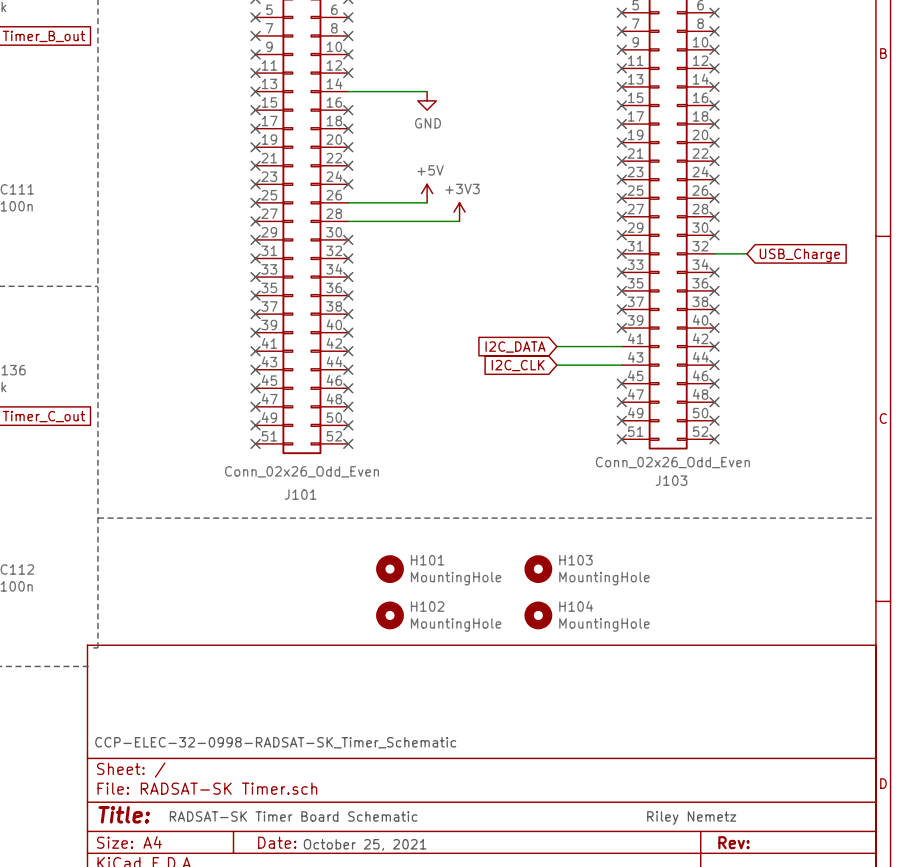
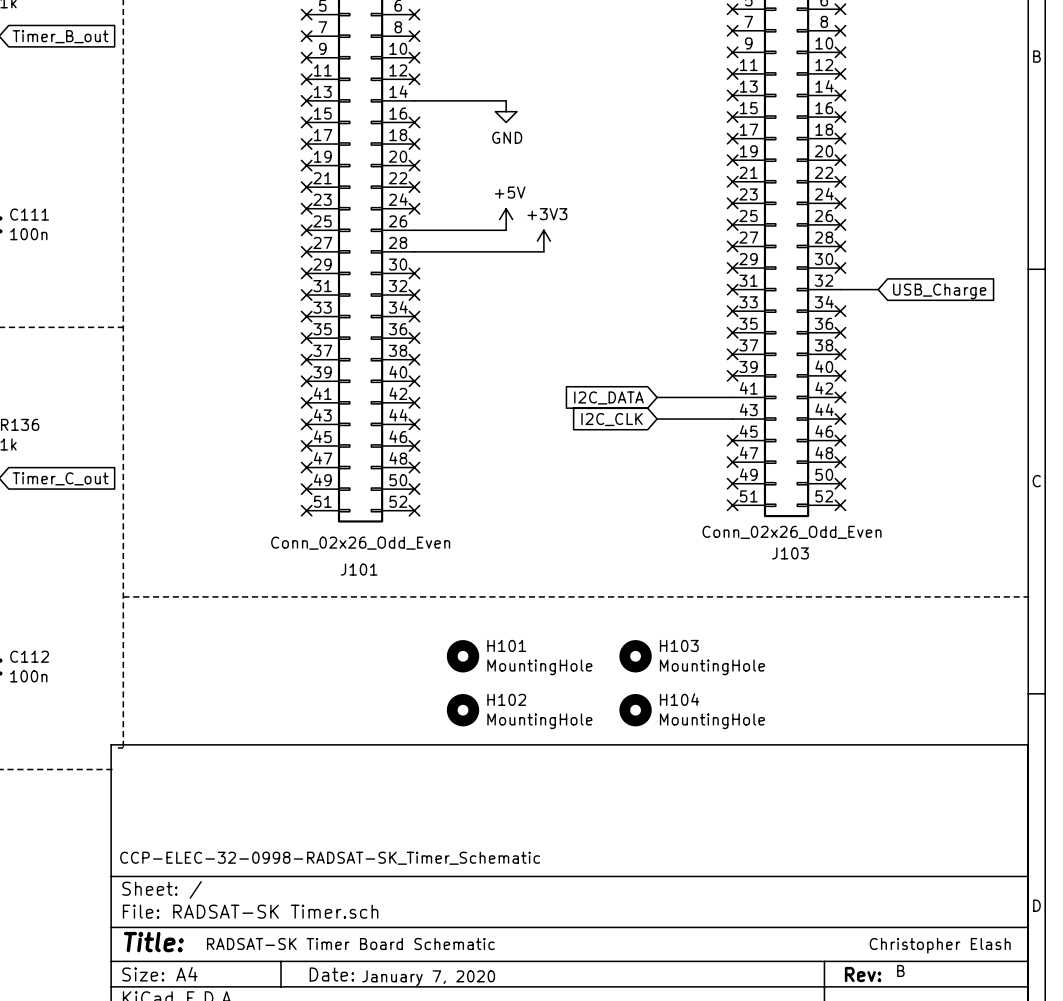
text: Riley Nemetz (691, 818) -> Christopher Elash (940, 945)
text: none -> B (900, 970)
text: October 25, 2021 (365, 844) -> January 7, 2020 (428, 978)

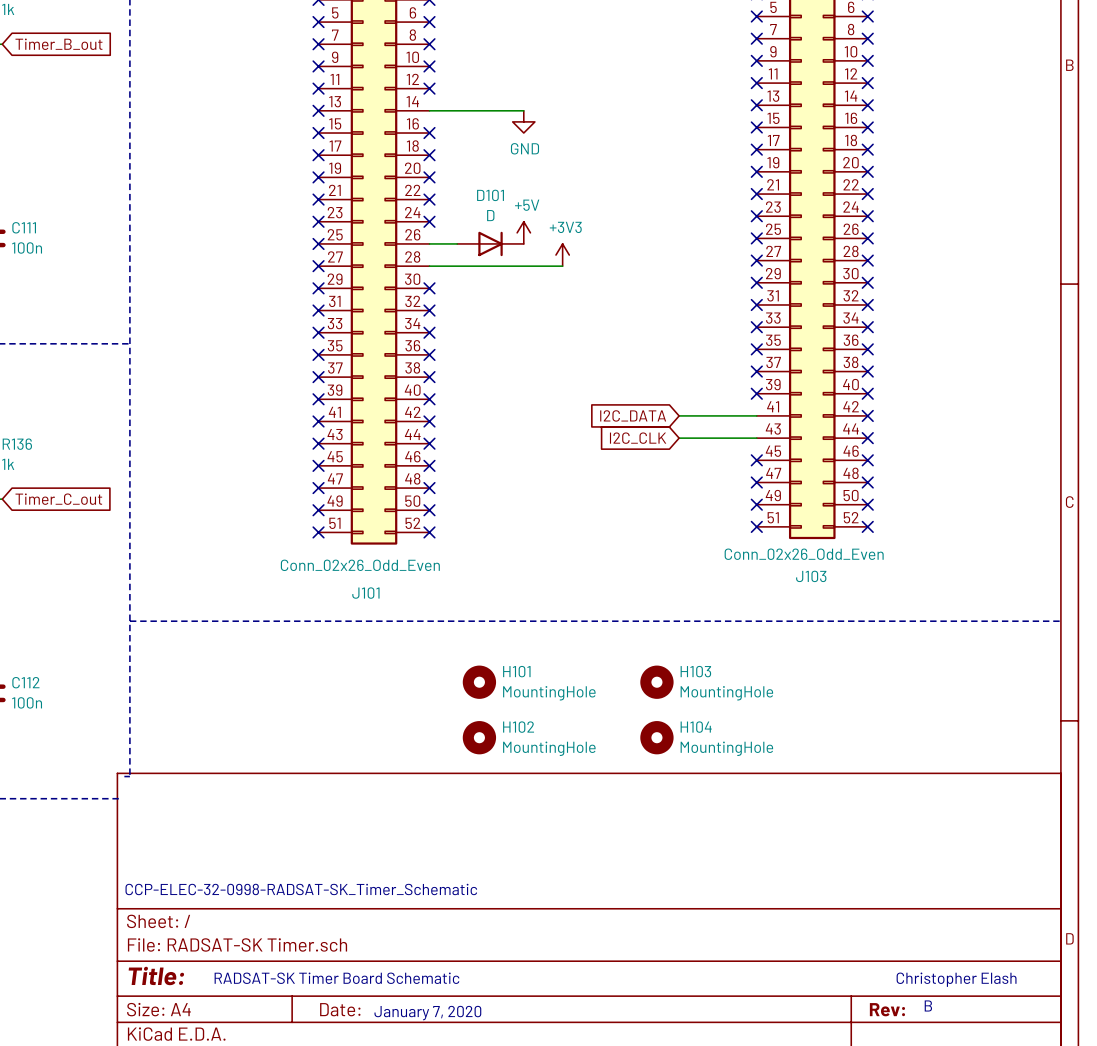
D101: none -> D (490, 243)
wire: (840, 289) (878, 289) -> none
no-connect mark: none -> (867, 304)
global label: USB_Charge (939, 291) -> none

